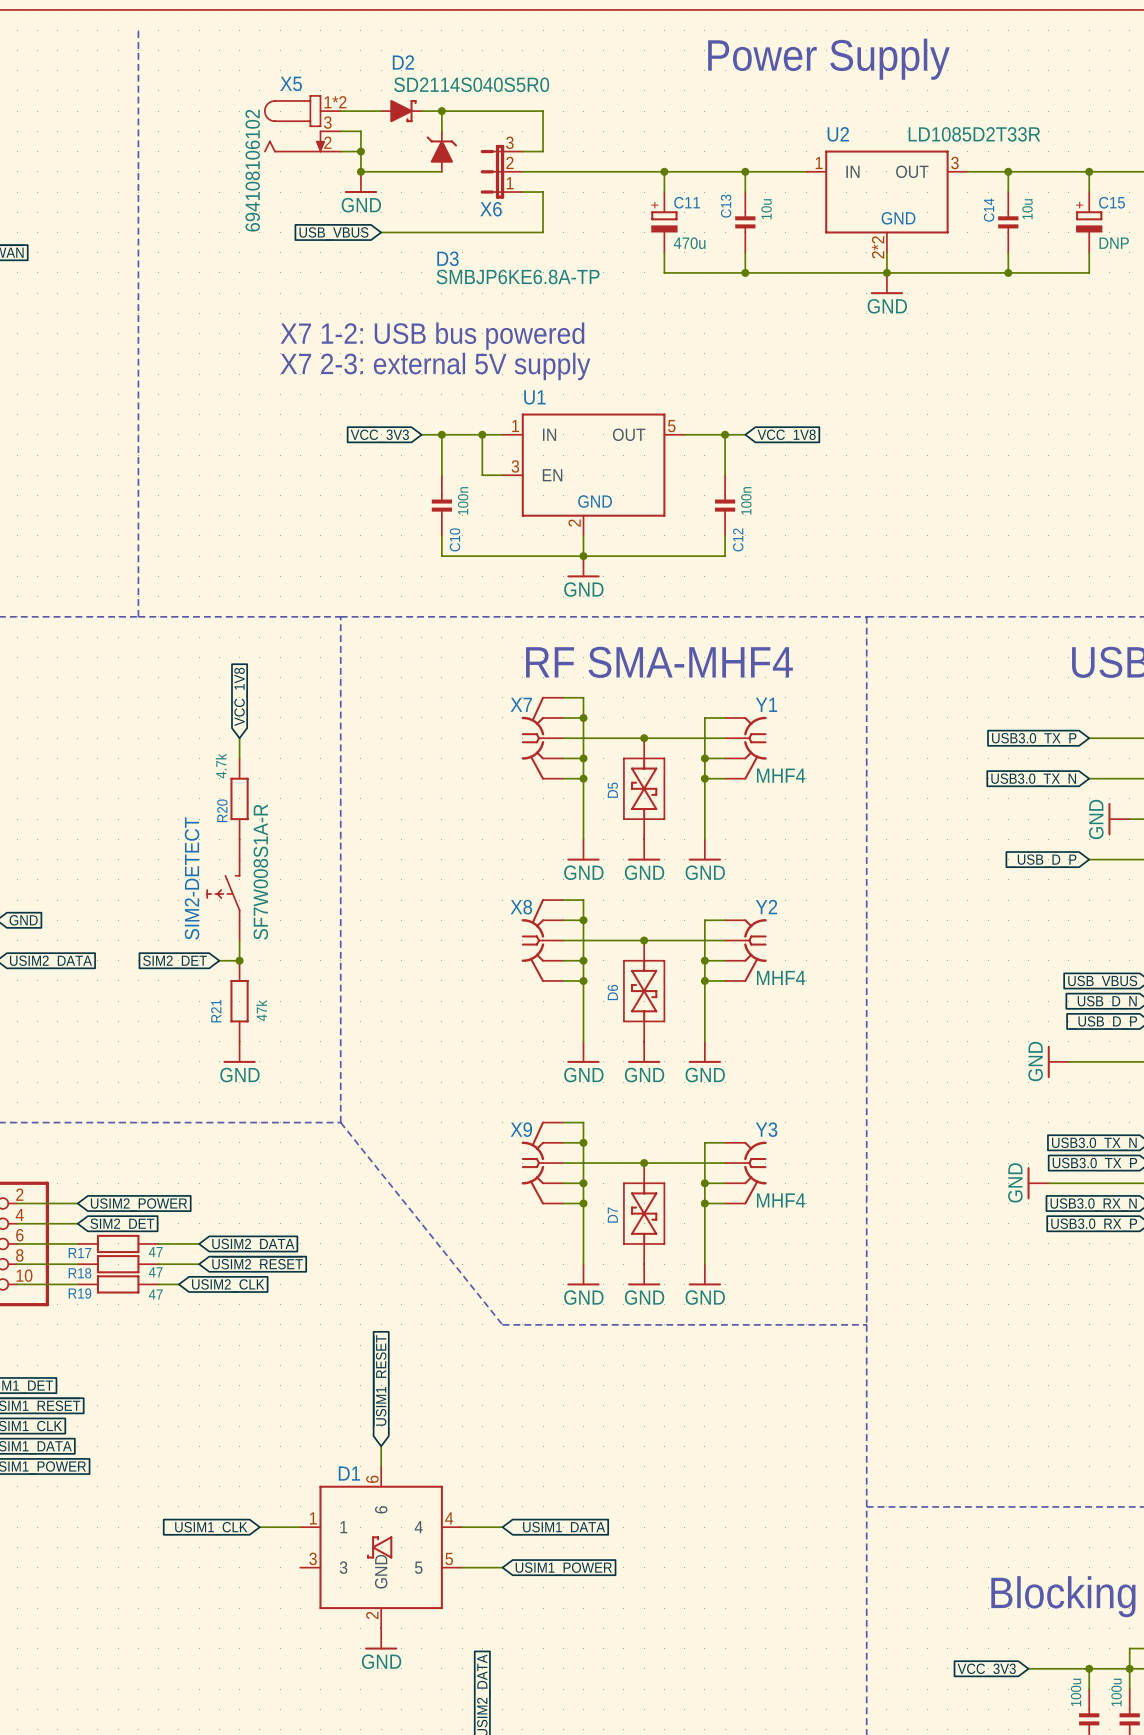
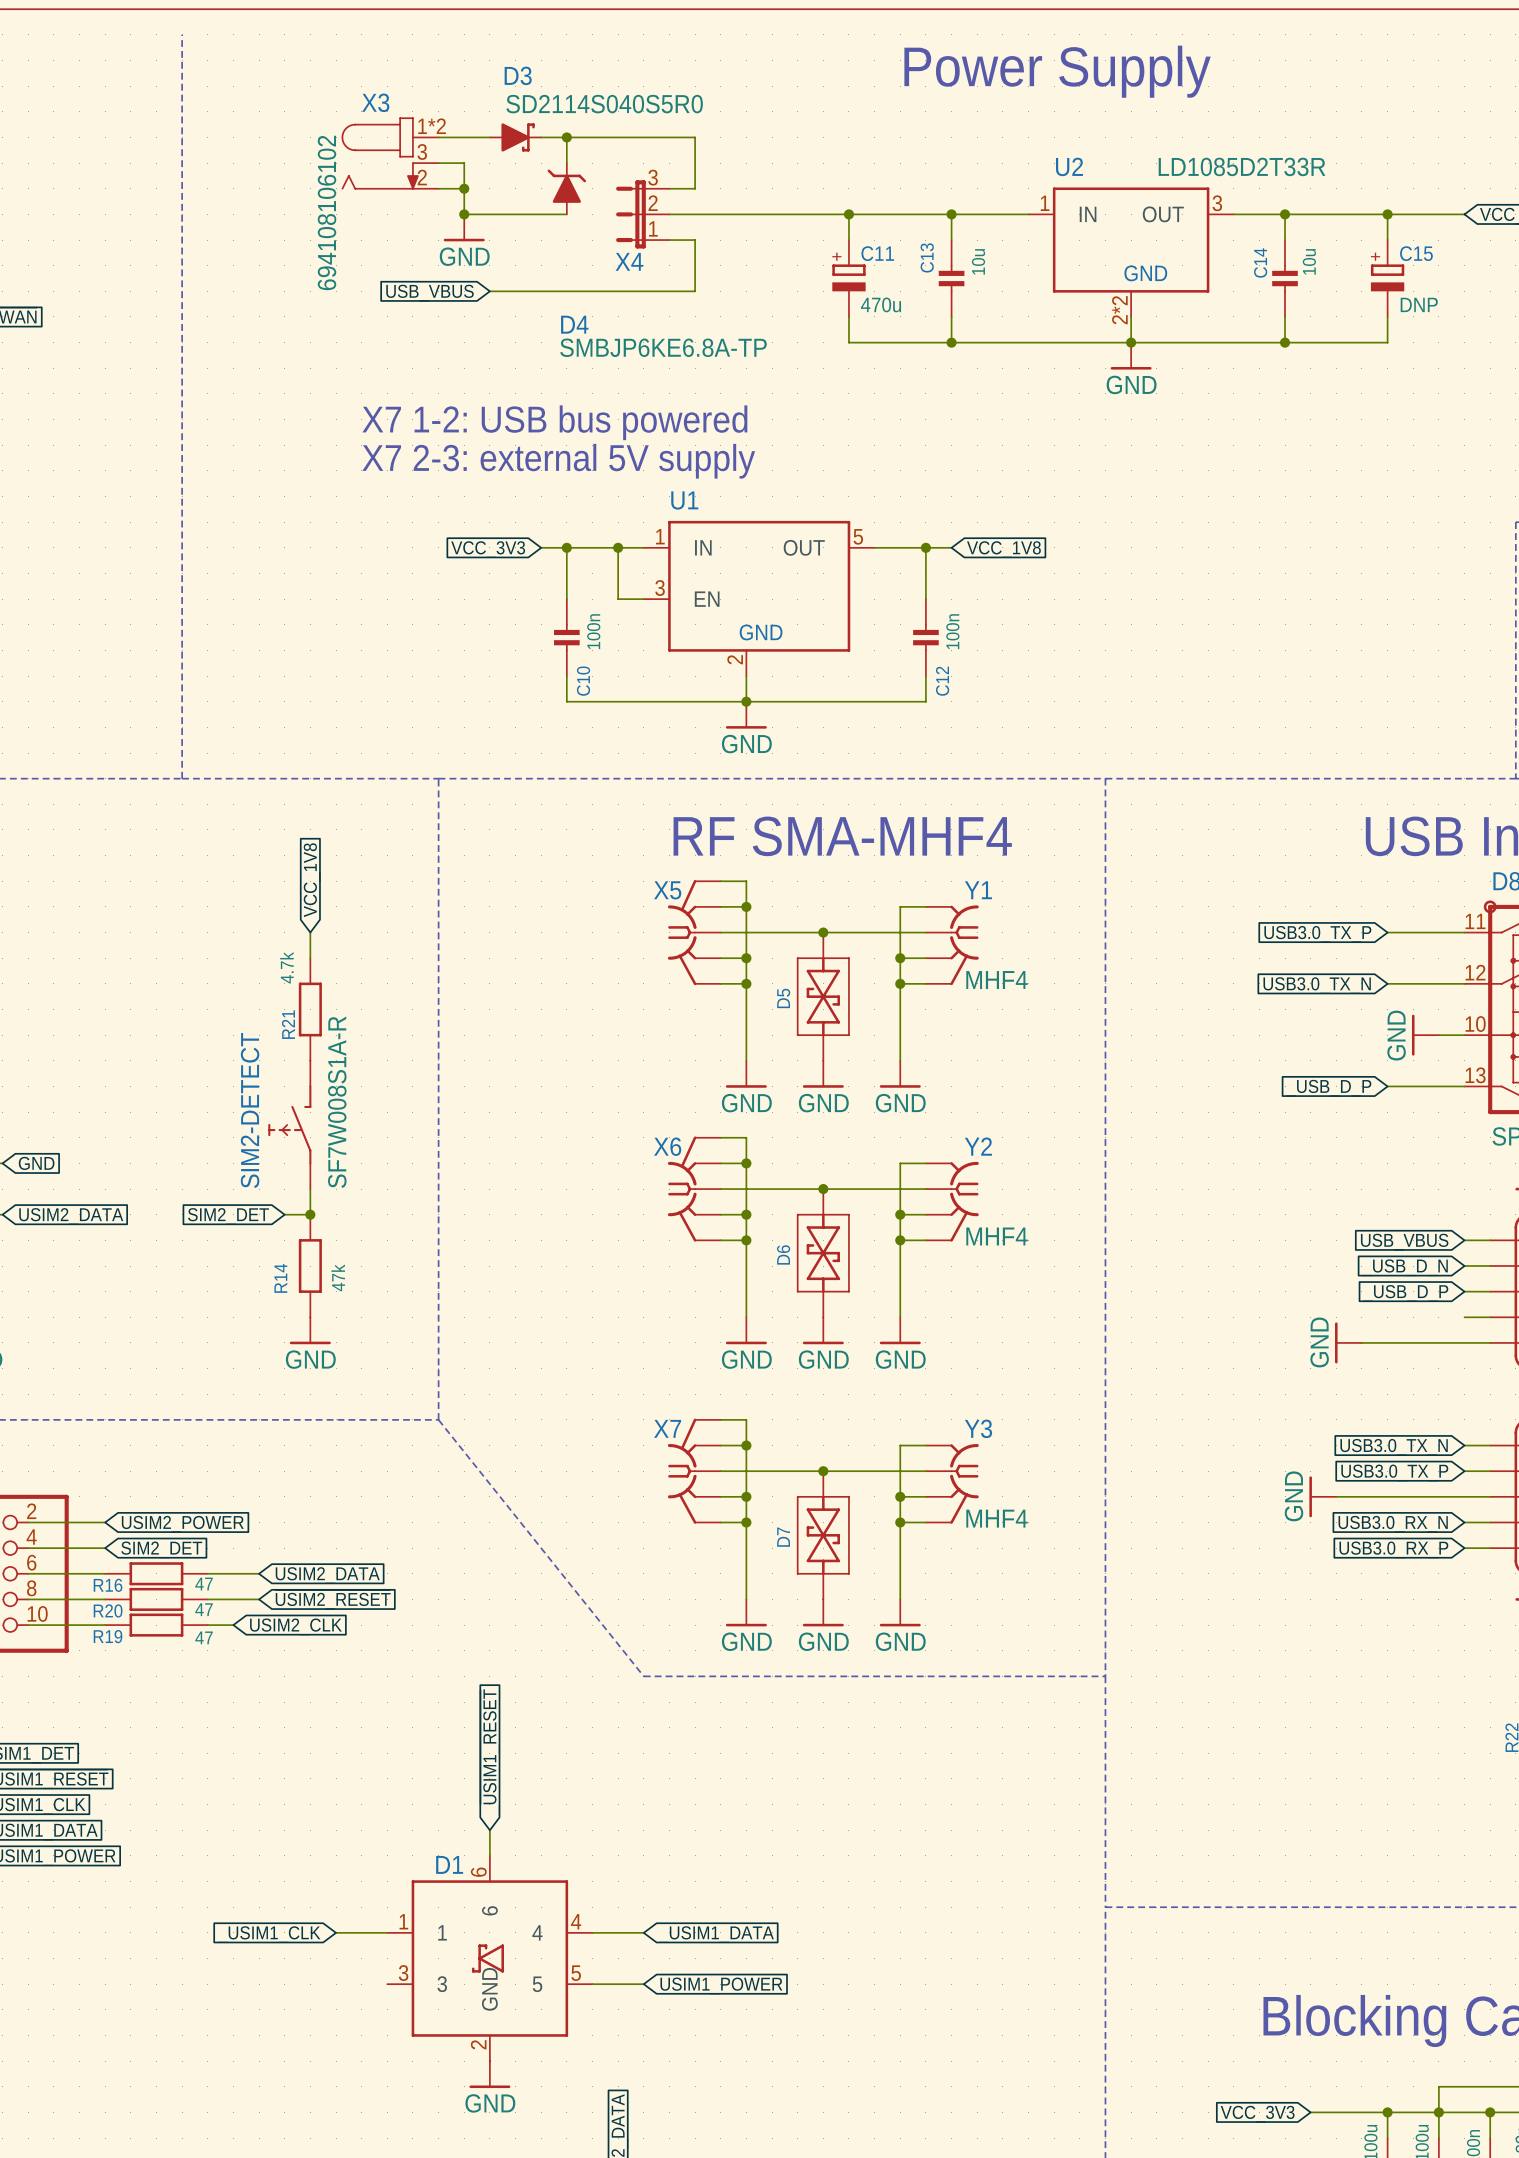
D2 name: D2 (403, 62) -> D3 (518, 75)
X5 name: X5 (291, 83) -> X3 (375, 102)
X6 name: X6 (491, 209) -> X4 (629, 261)
D3 name: D3 (447, 258) -> D4 (574, 324)
X7 name: X7 (521, 704) -> X5 (667, 890)
R20 name: R20 (222, 810) -> R21 (288, 1024)
X8 name: X8 (521, 907) -> X6 (667, 1146)
R21 name: R21 (216, 1011) -> R14 (280, 1278)
X9 name: X9 (521, 1129) -> X7 (667, 1428)
R17 name: R17 (79, 1253) -> R16 (108, 1585)
R18 name: R18 (80, 1273) -> R20 (108, 1610)

